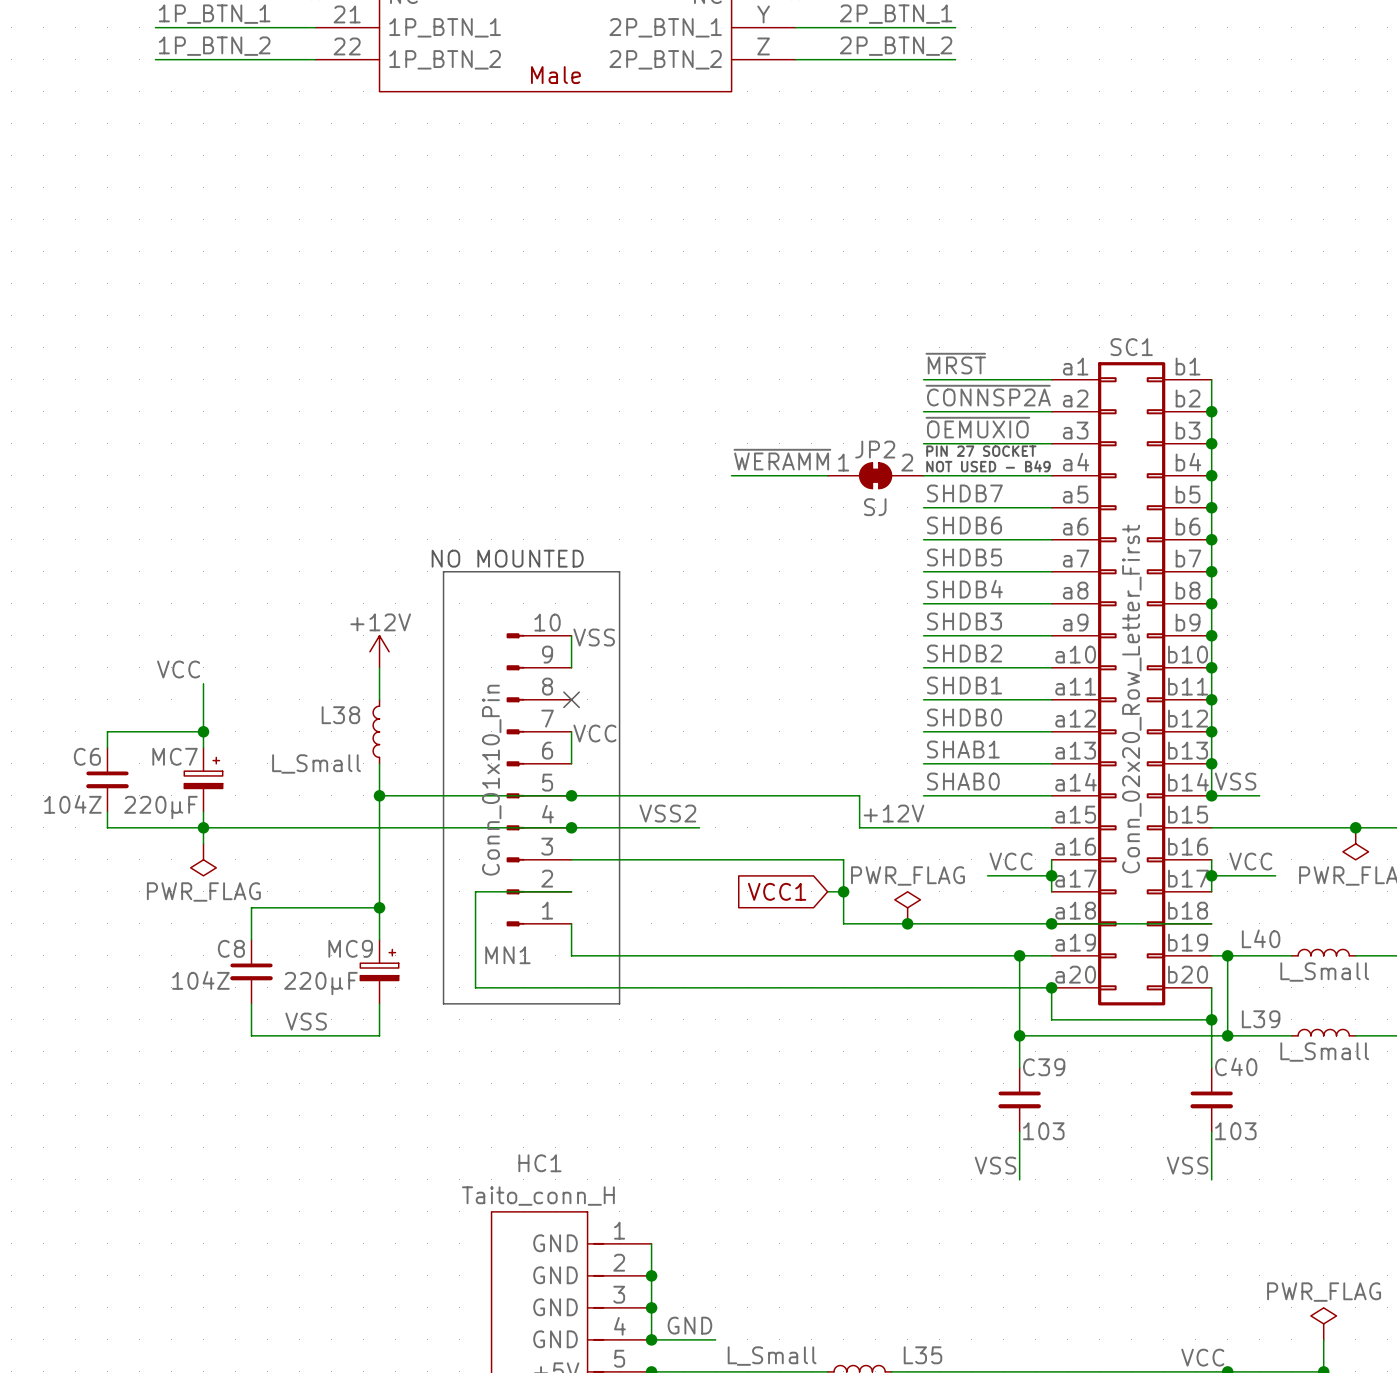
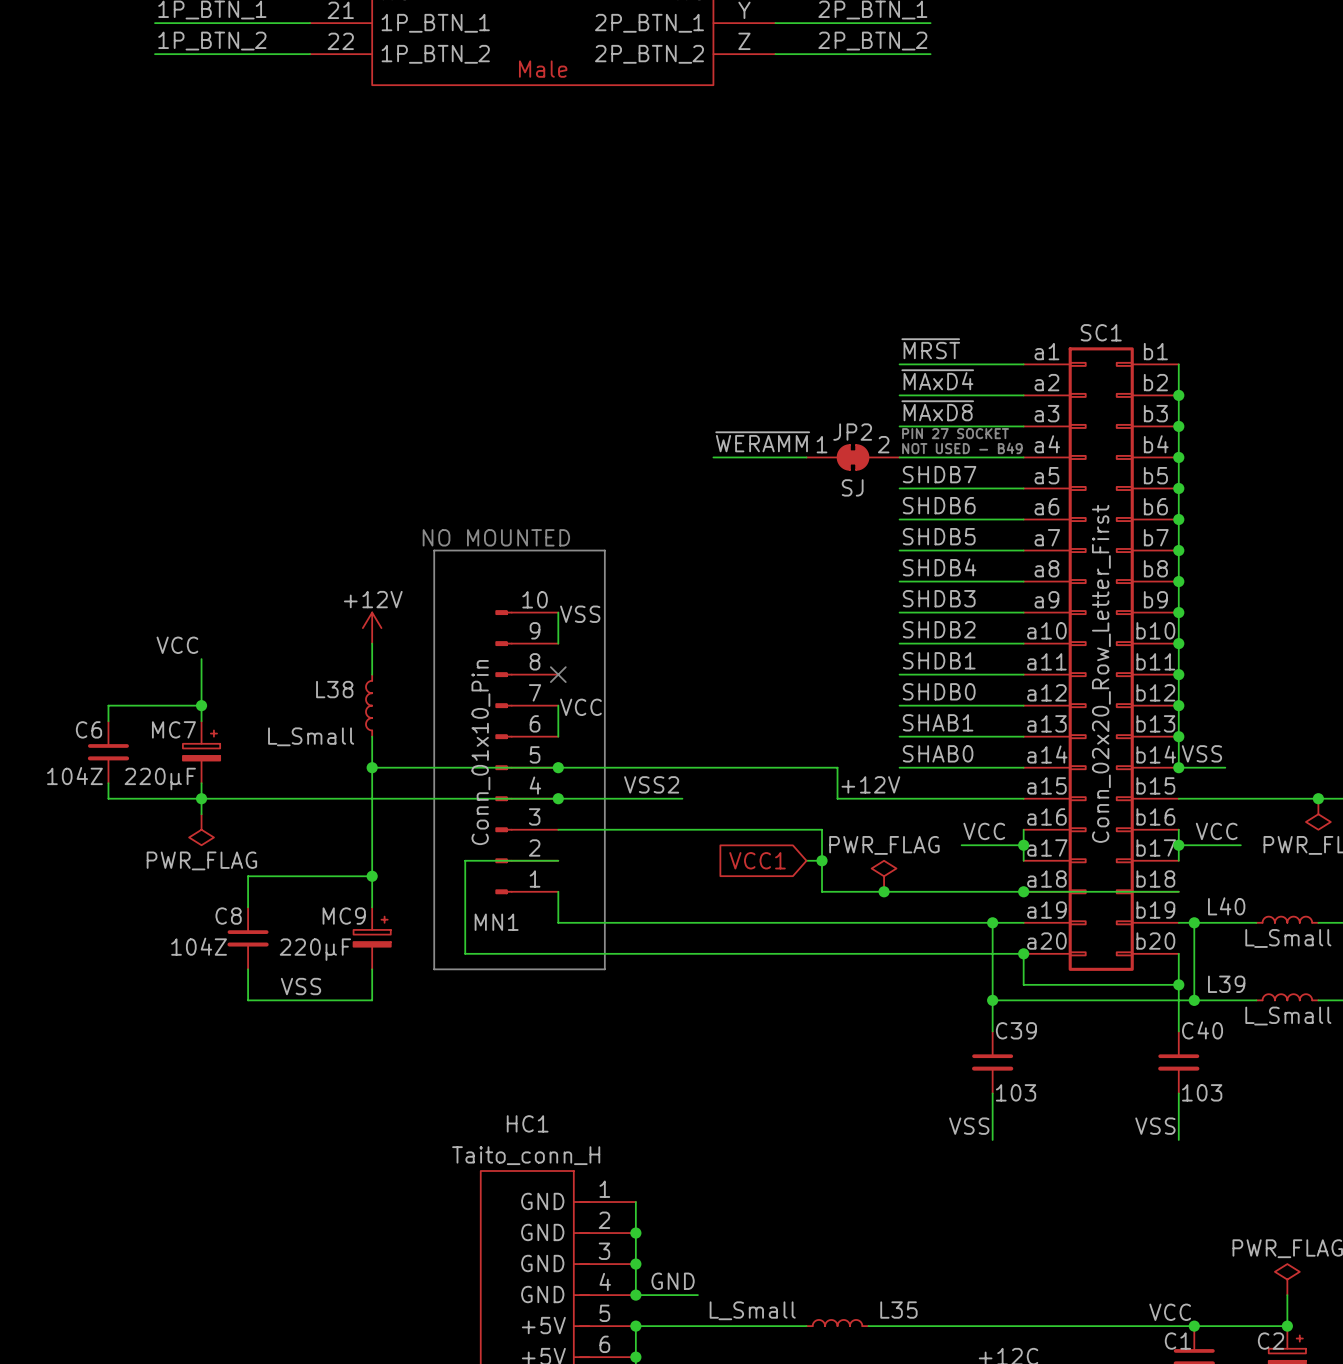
label: ~{CONNSP2A} (988, 395) -> ~{MAxD4} (937, 379)
label: ~{OEMUXIO} (977, 427) -> ~{MAxD8} (937, 410)

